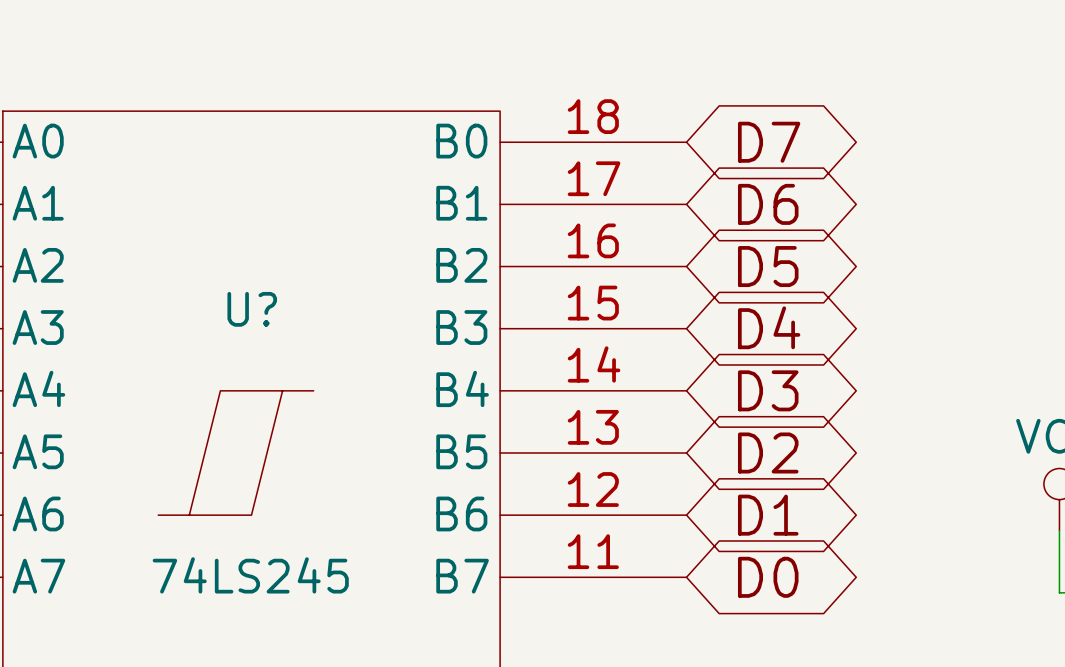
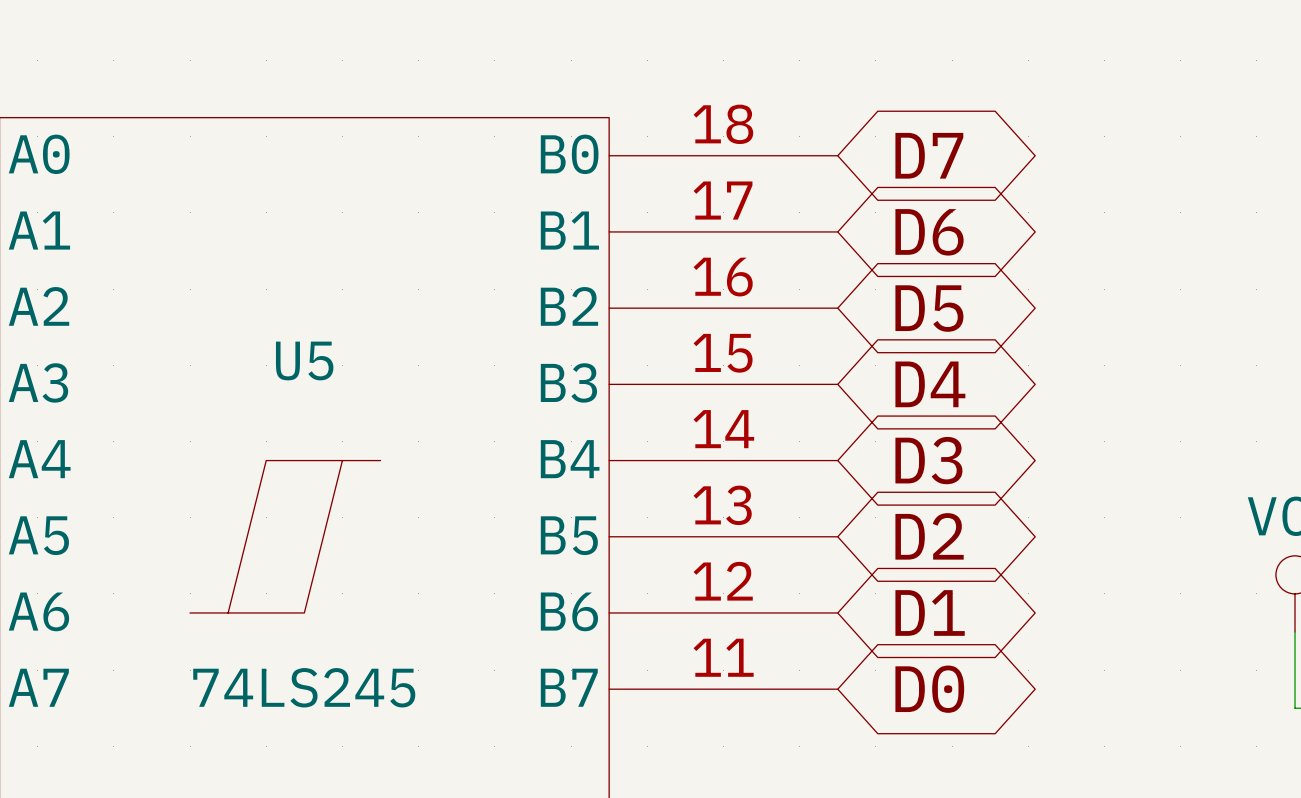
U? name: U? (252, 309) -> U5 (304, 360)

